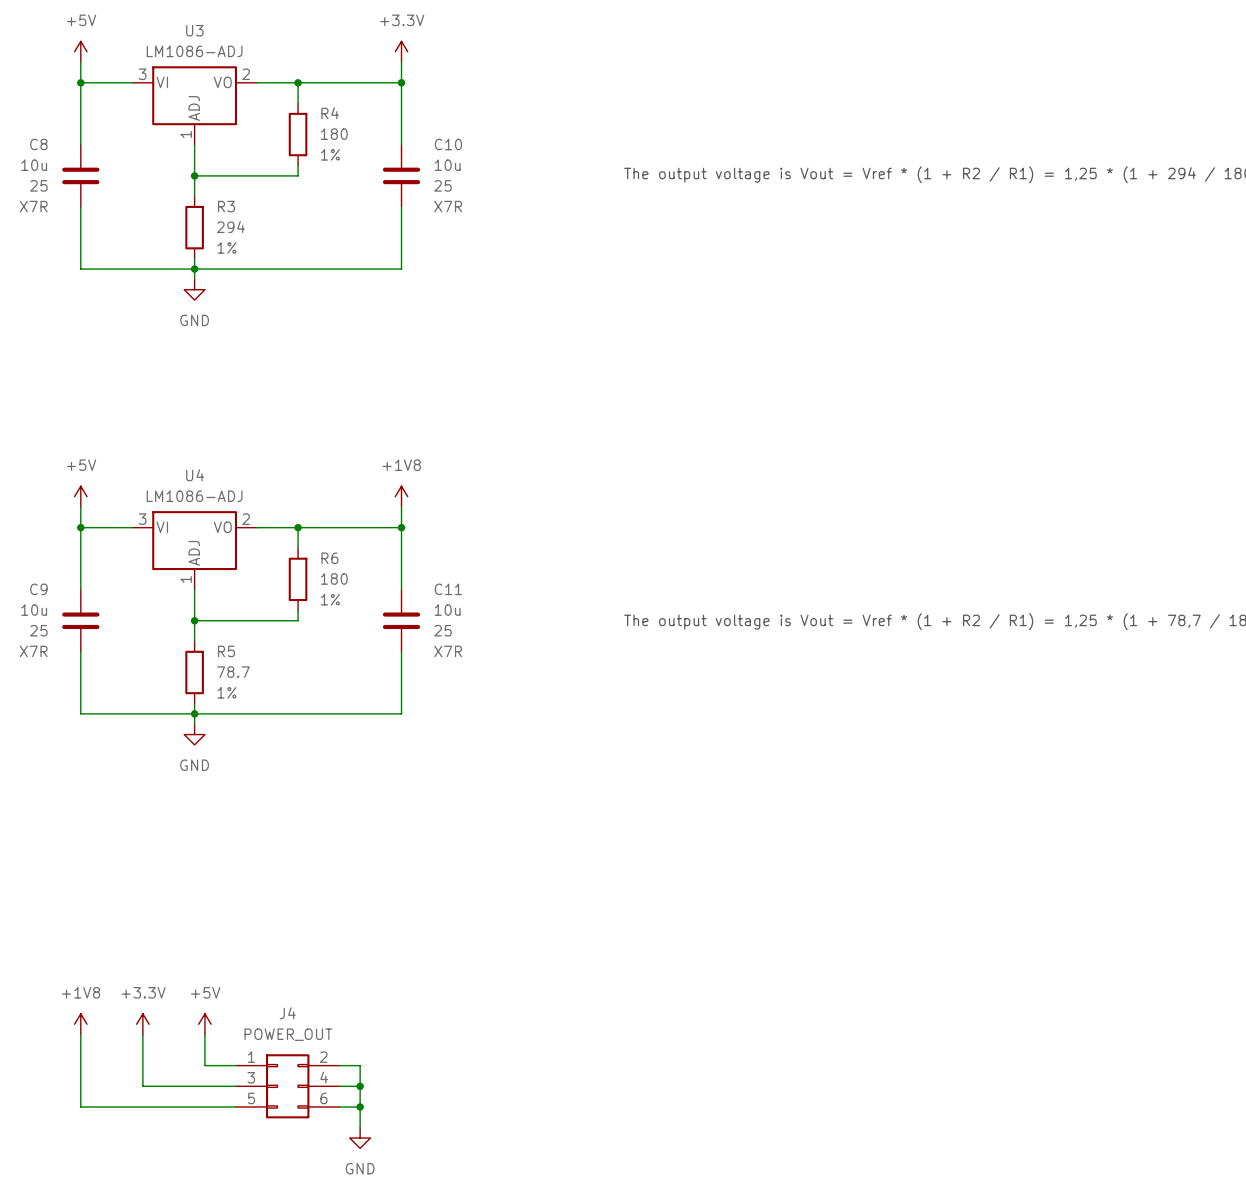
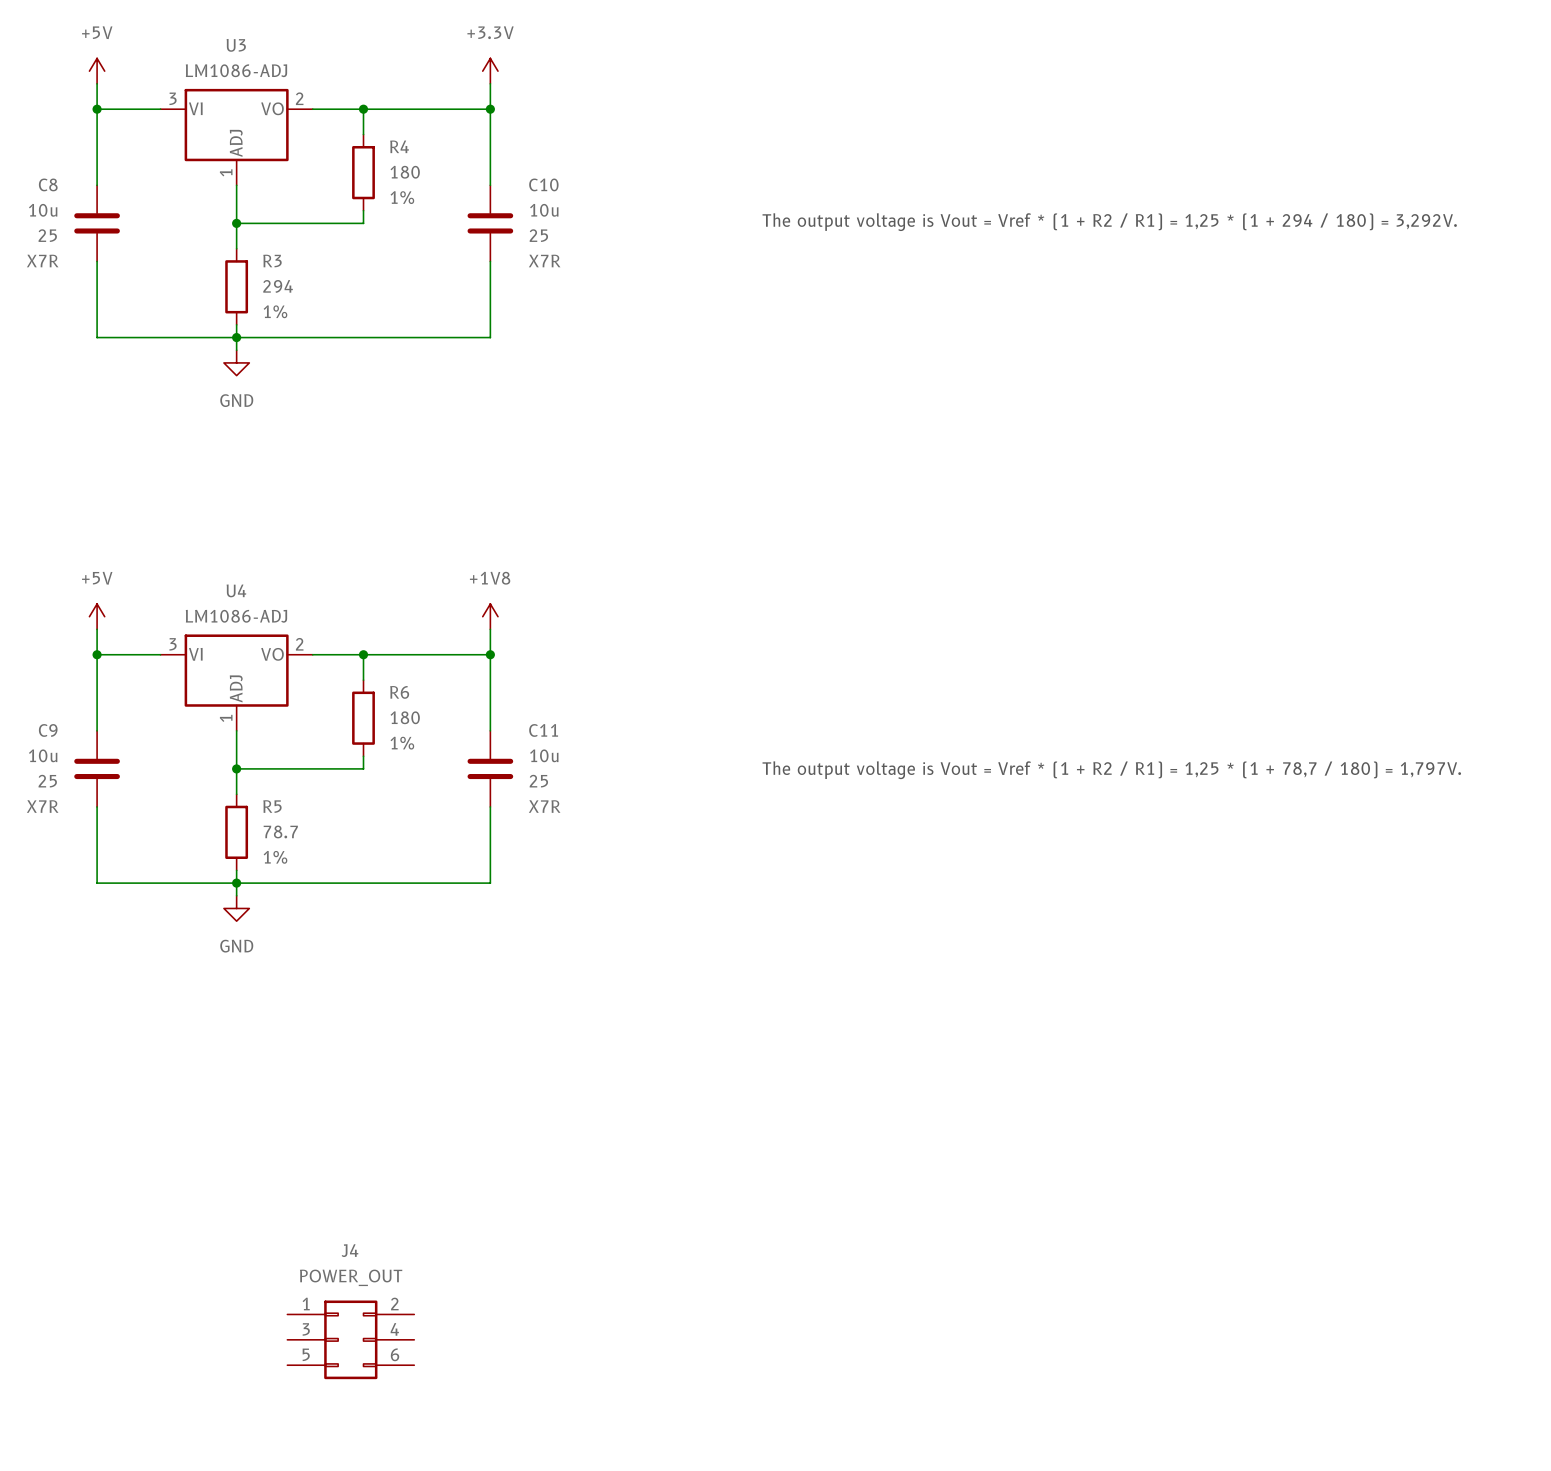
power symbol: +1V8 (80, 1024) -> none
power symbol: +3.3V (142, 1024) -> none
power symbol: +5V (204, 1024) -> none
wire: (80, 1034) (80, 1107) (235, 1107) -> none
wire: (142, 1034) (142, 1086) (235, 1086) -> none
wire: (204, 1034) (204, 1065) (235, 1065) -> none
wire: (339, 1065) (360, 1065) (360, 1127) -> none
wire: (339, 1086) (360, 1086) -> none
junction: (360, 1086) -> none
wire: (339, 1107) (360, 1107) -> none
junction: (360, 1107) -> none
power symbol: GND (360, 1138) -> none

